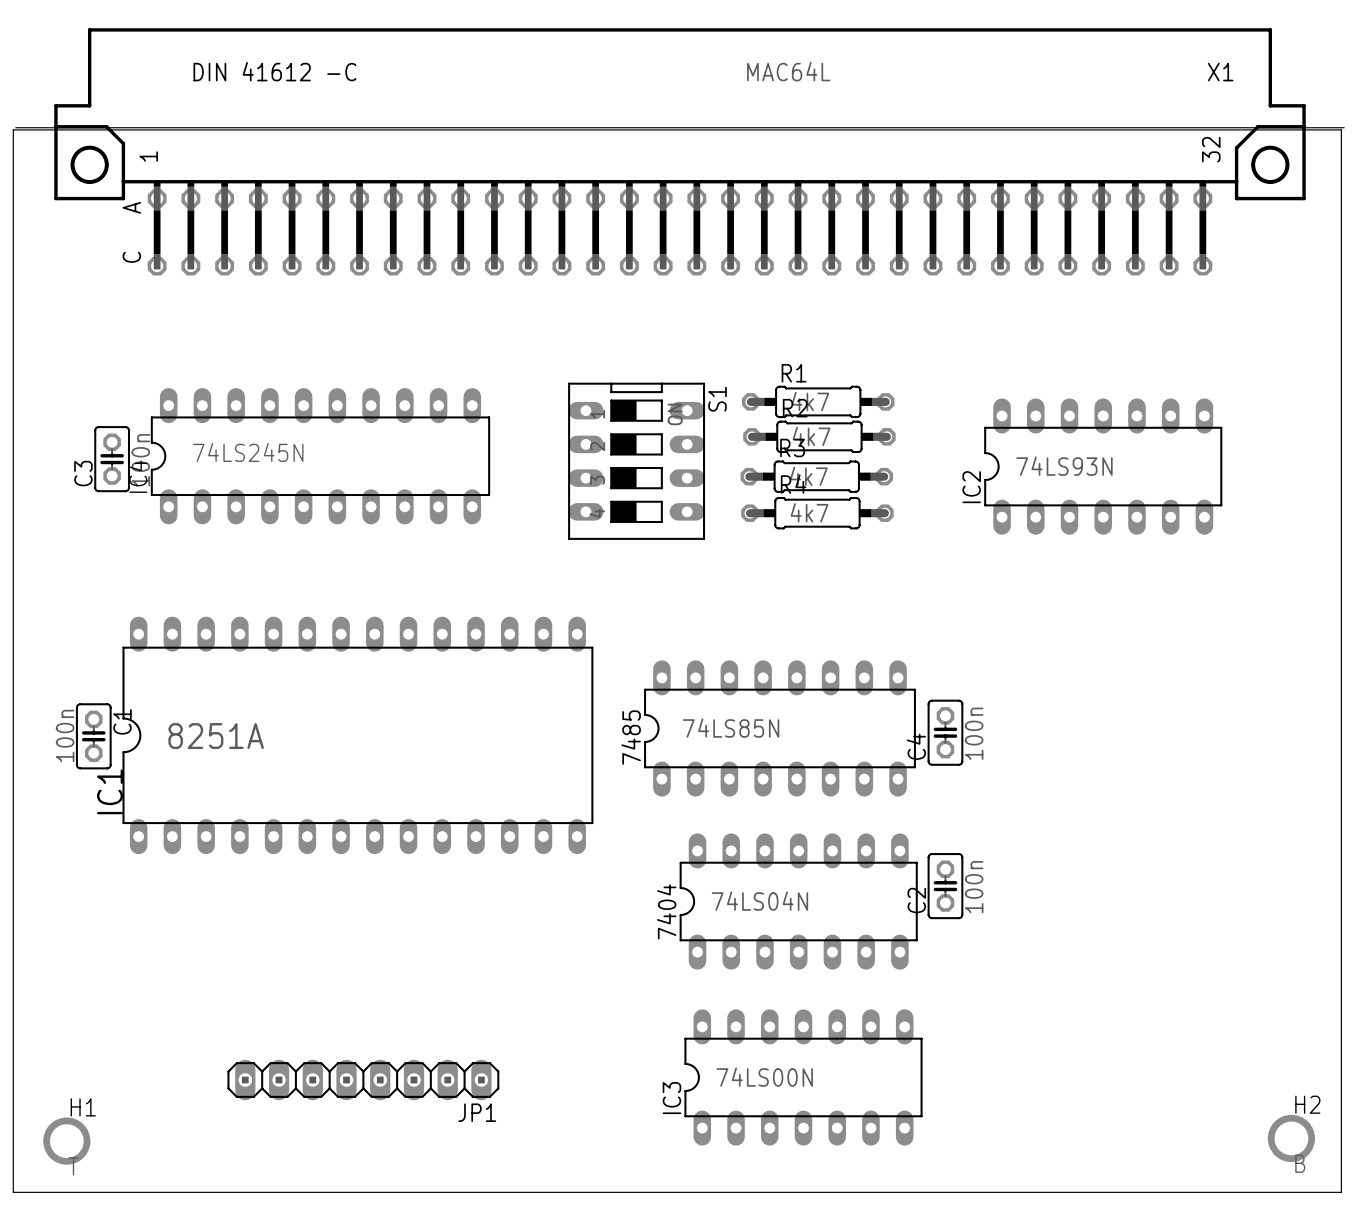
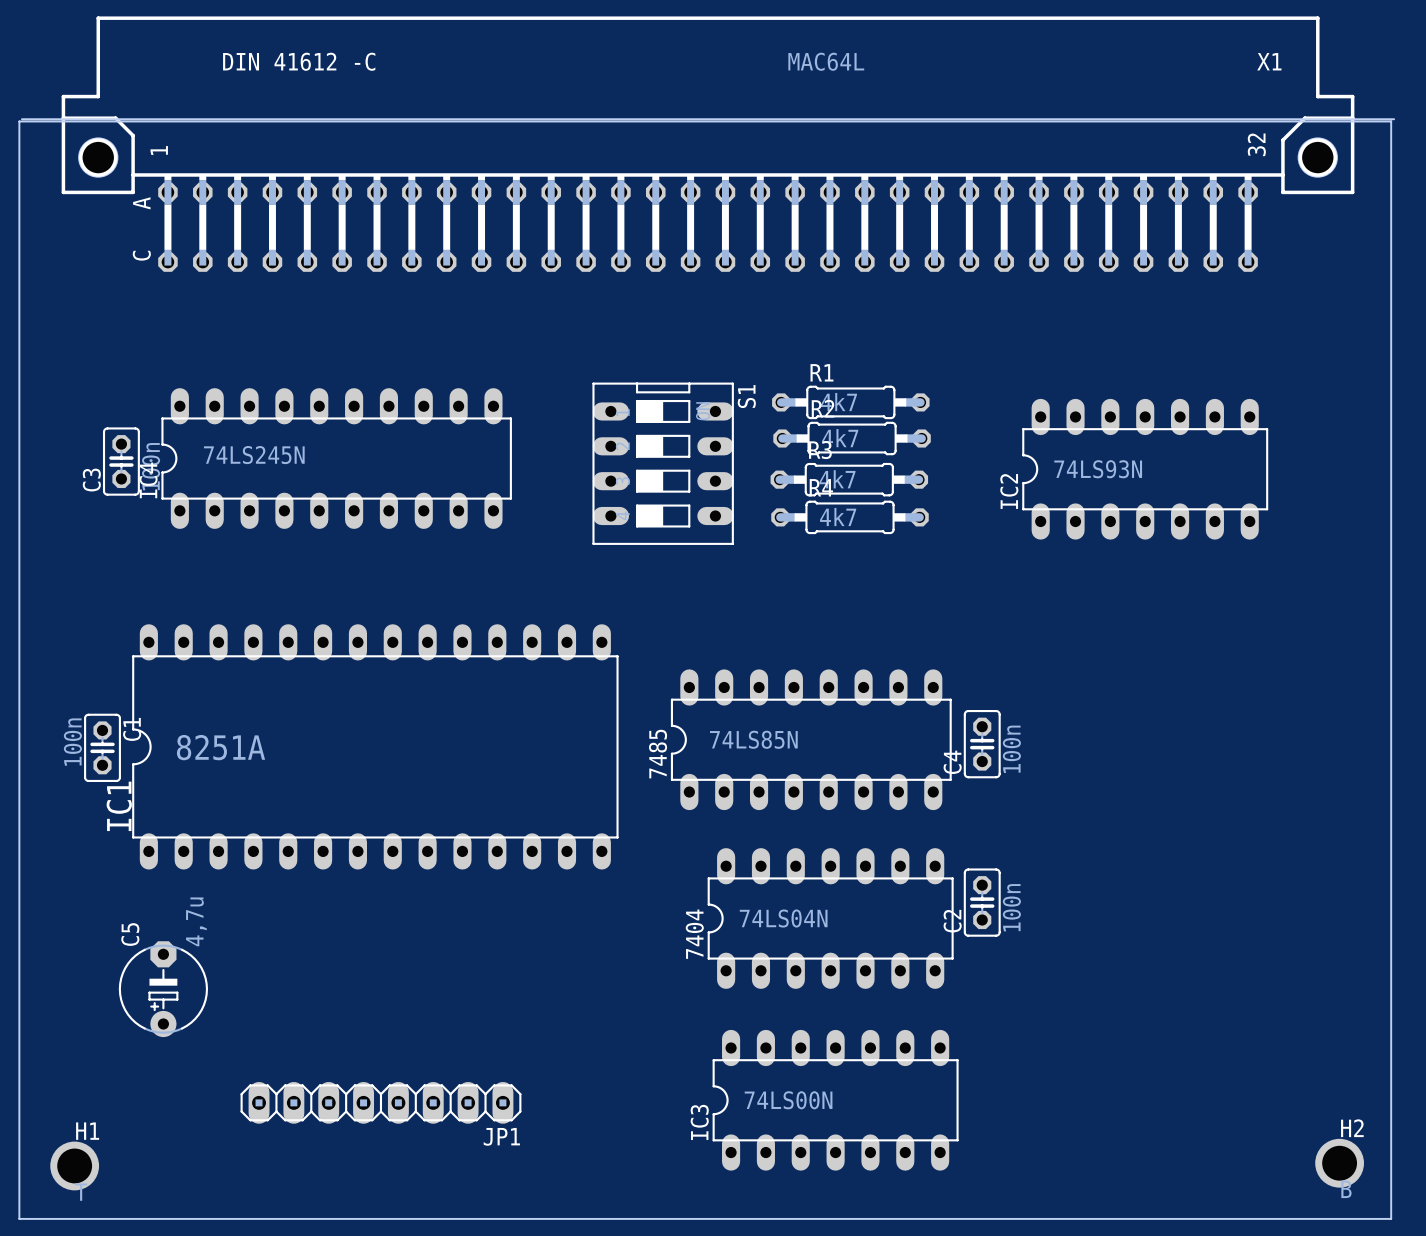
C5: none -> 4,7u (163, 989)

